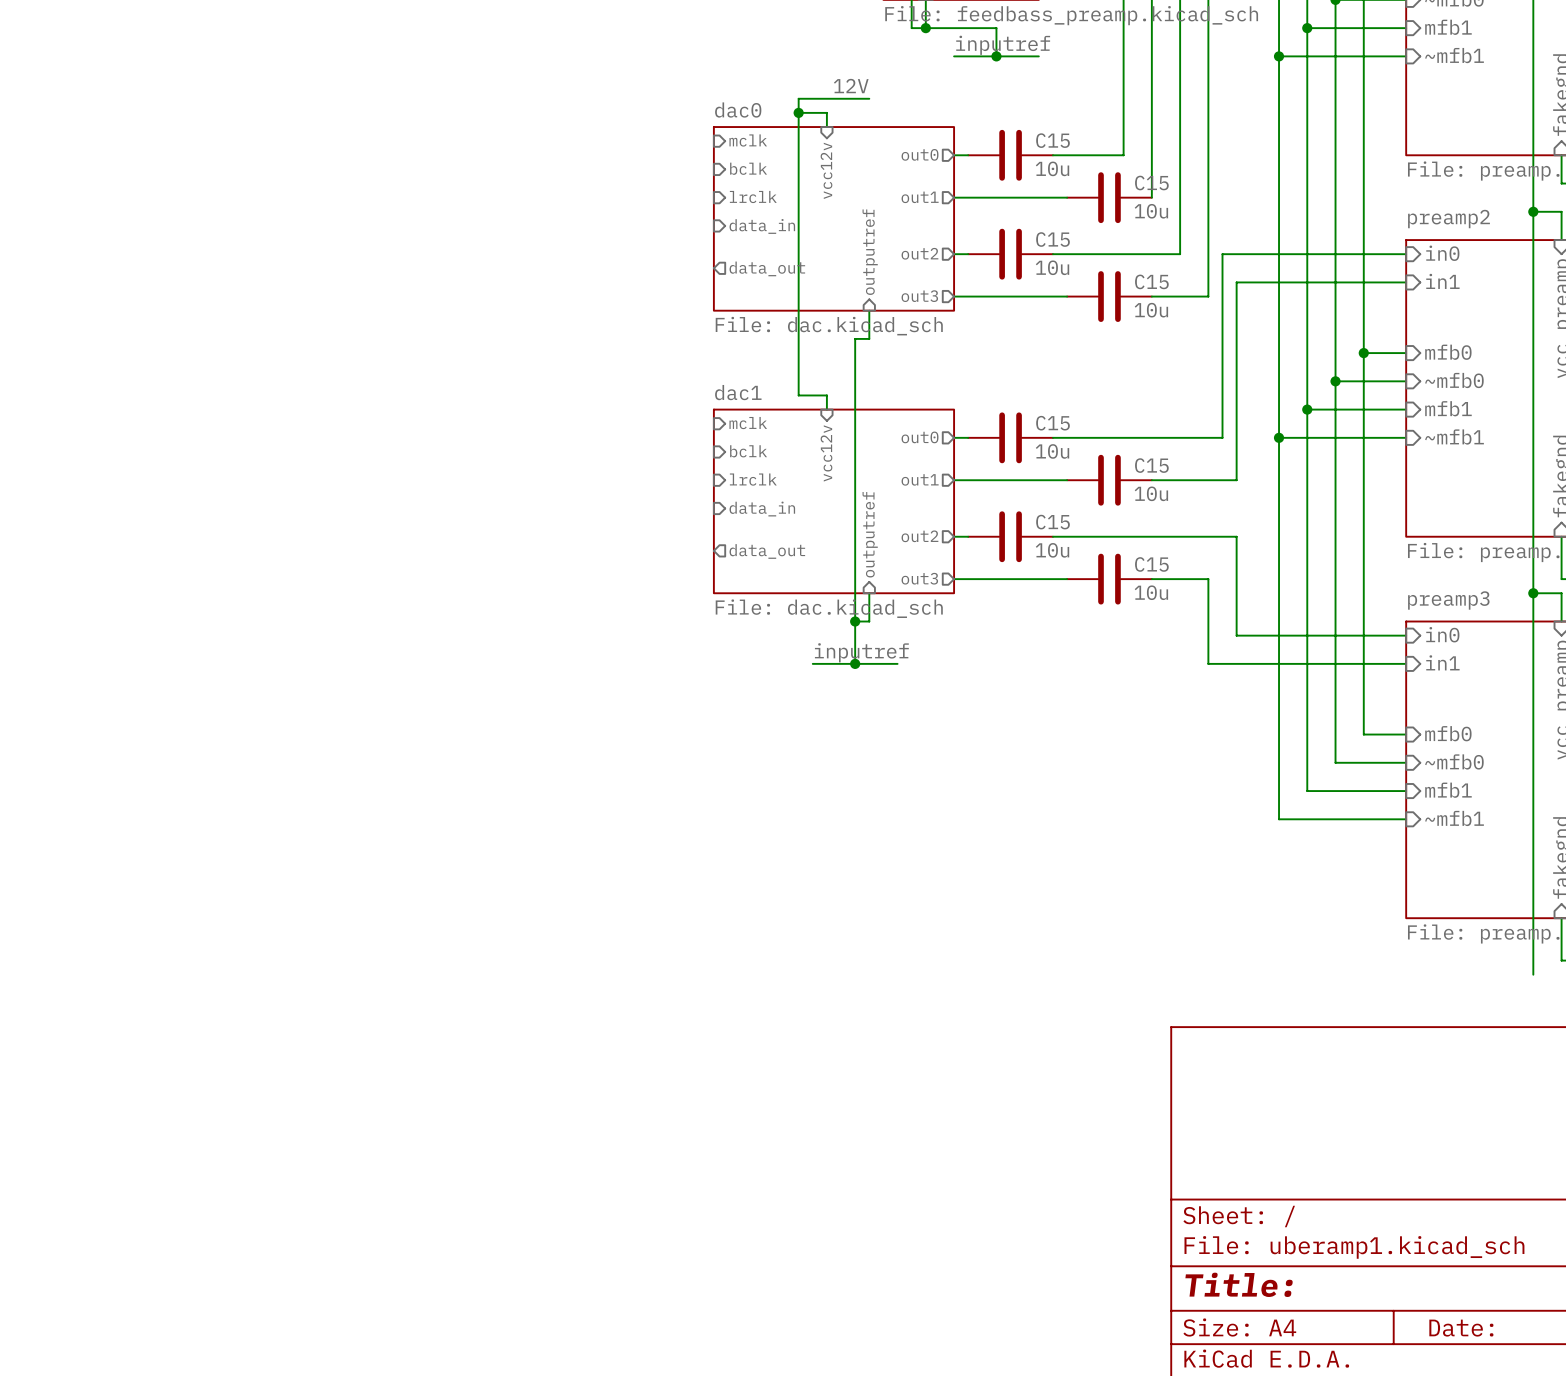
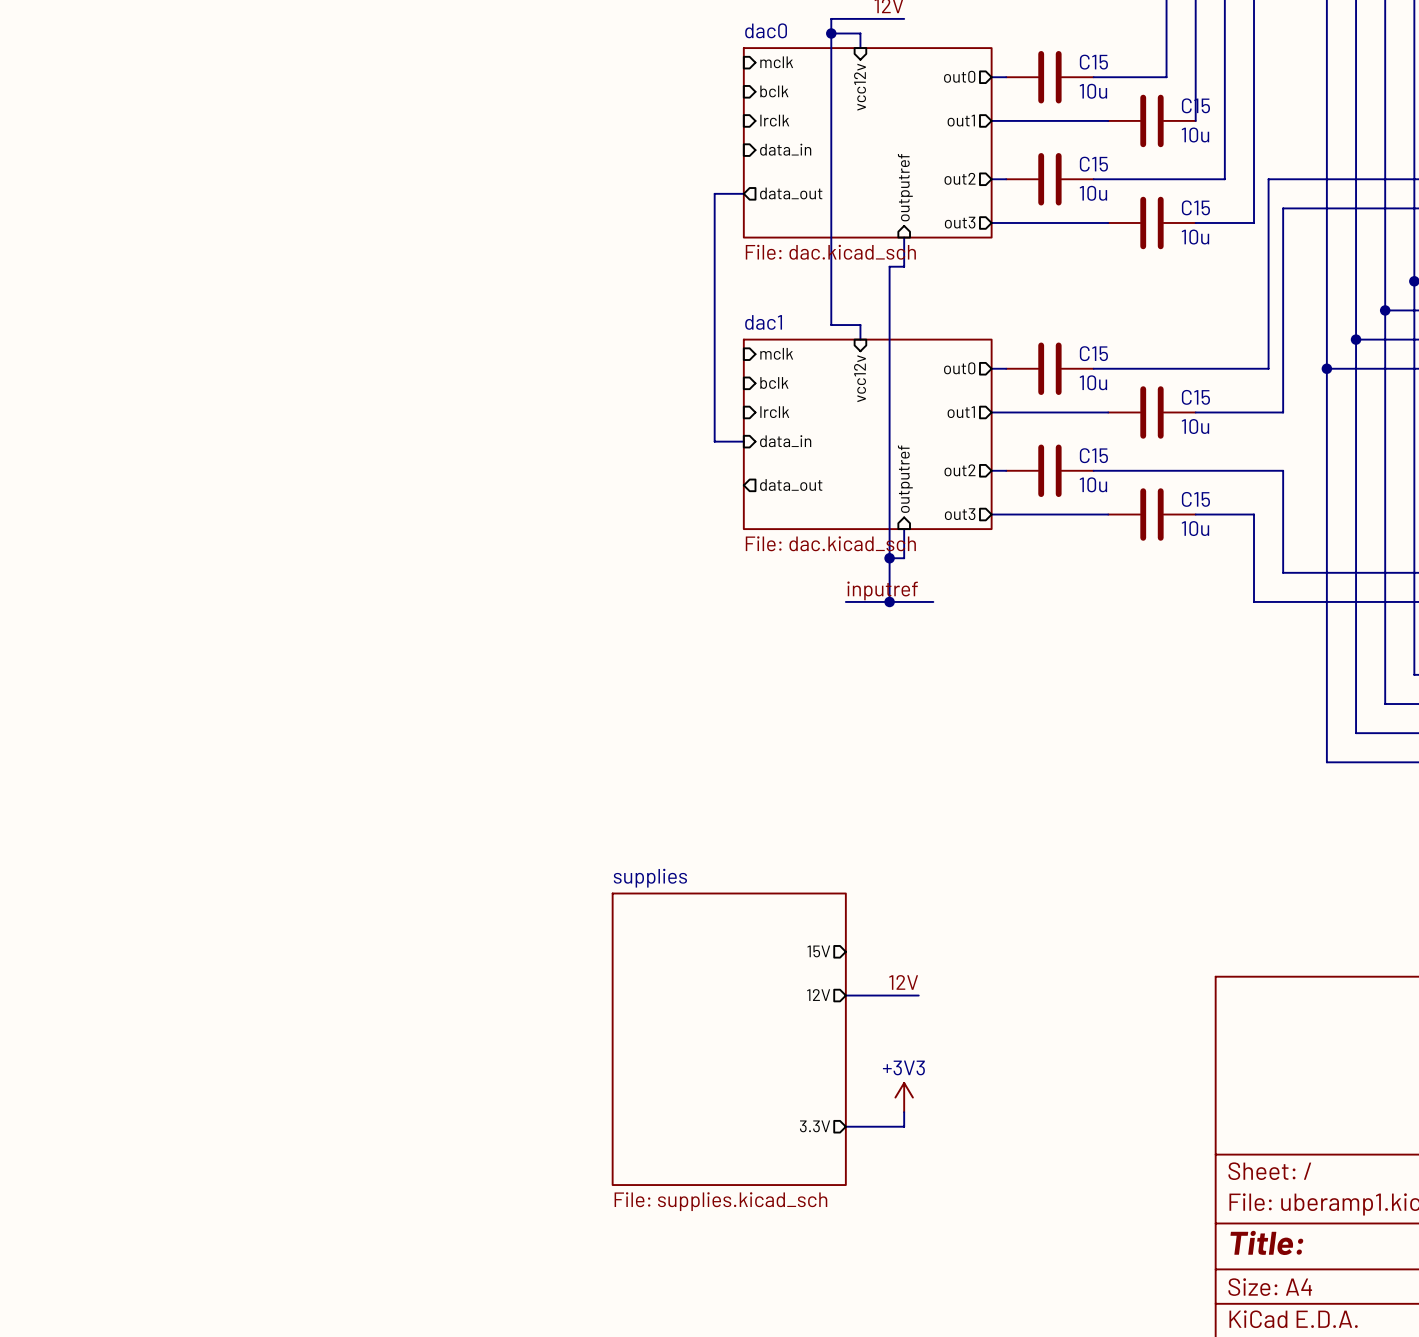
wire: none -> (743, 193) (714, 193) (714, 441) (743, 441)
sheet pin: none -> 15V (818, 951)
label: none -> 12V (903, 982)
sheet pin: none -> 12V (818, 995)
wire: none -> (845, 995) (918, 995)
sheet supplies: none -> File: supplies.kicad_sch (729, 1039)
power symbol: none -> +3V3 (904, 1097)
wire: none -> (904, 1112) (904, 1126) (845, 1126)
sheet pin: none -> 3.3V (815, 1126)

